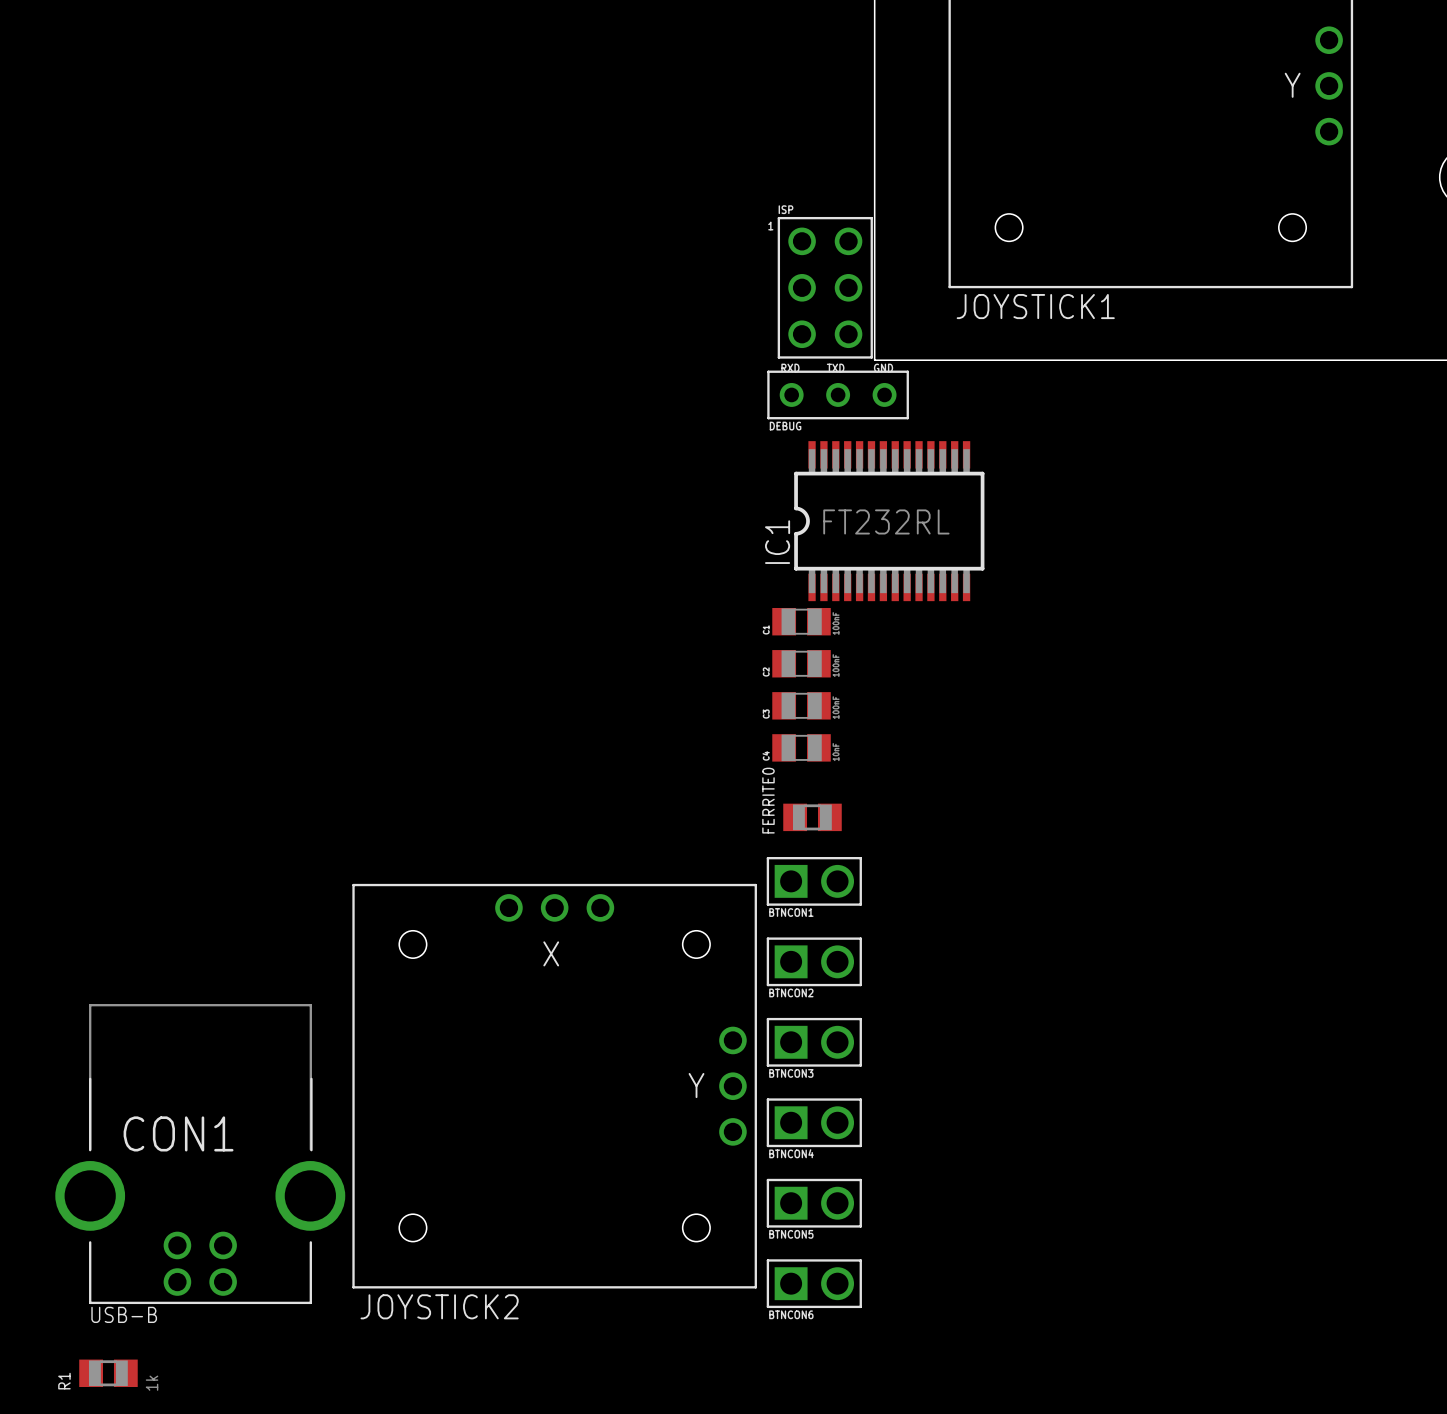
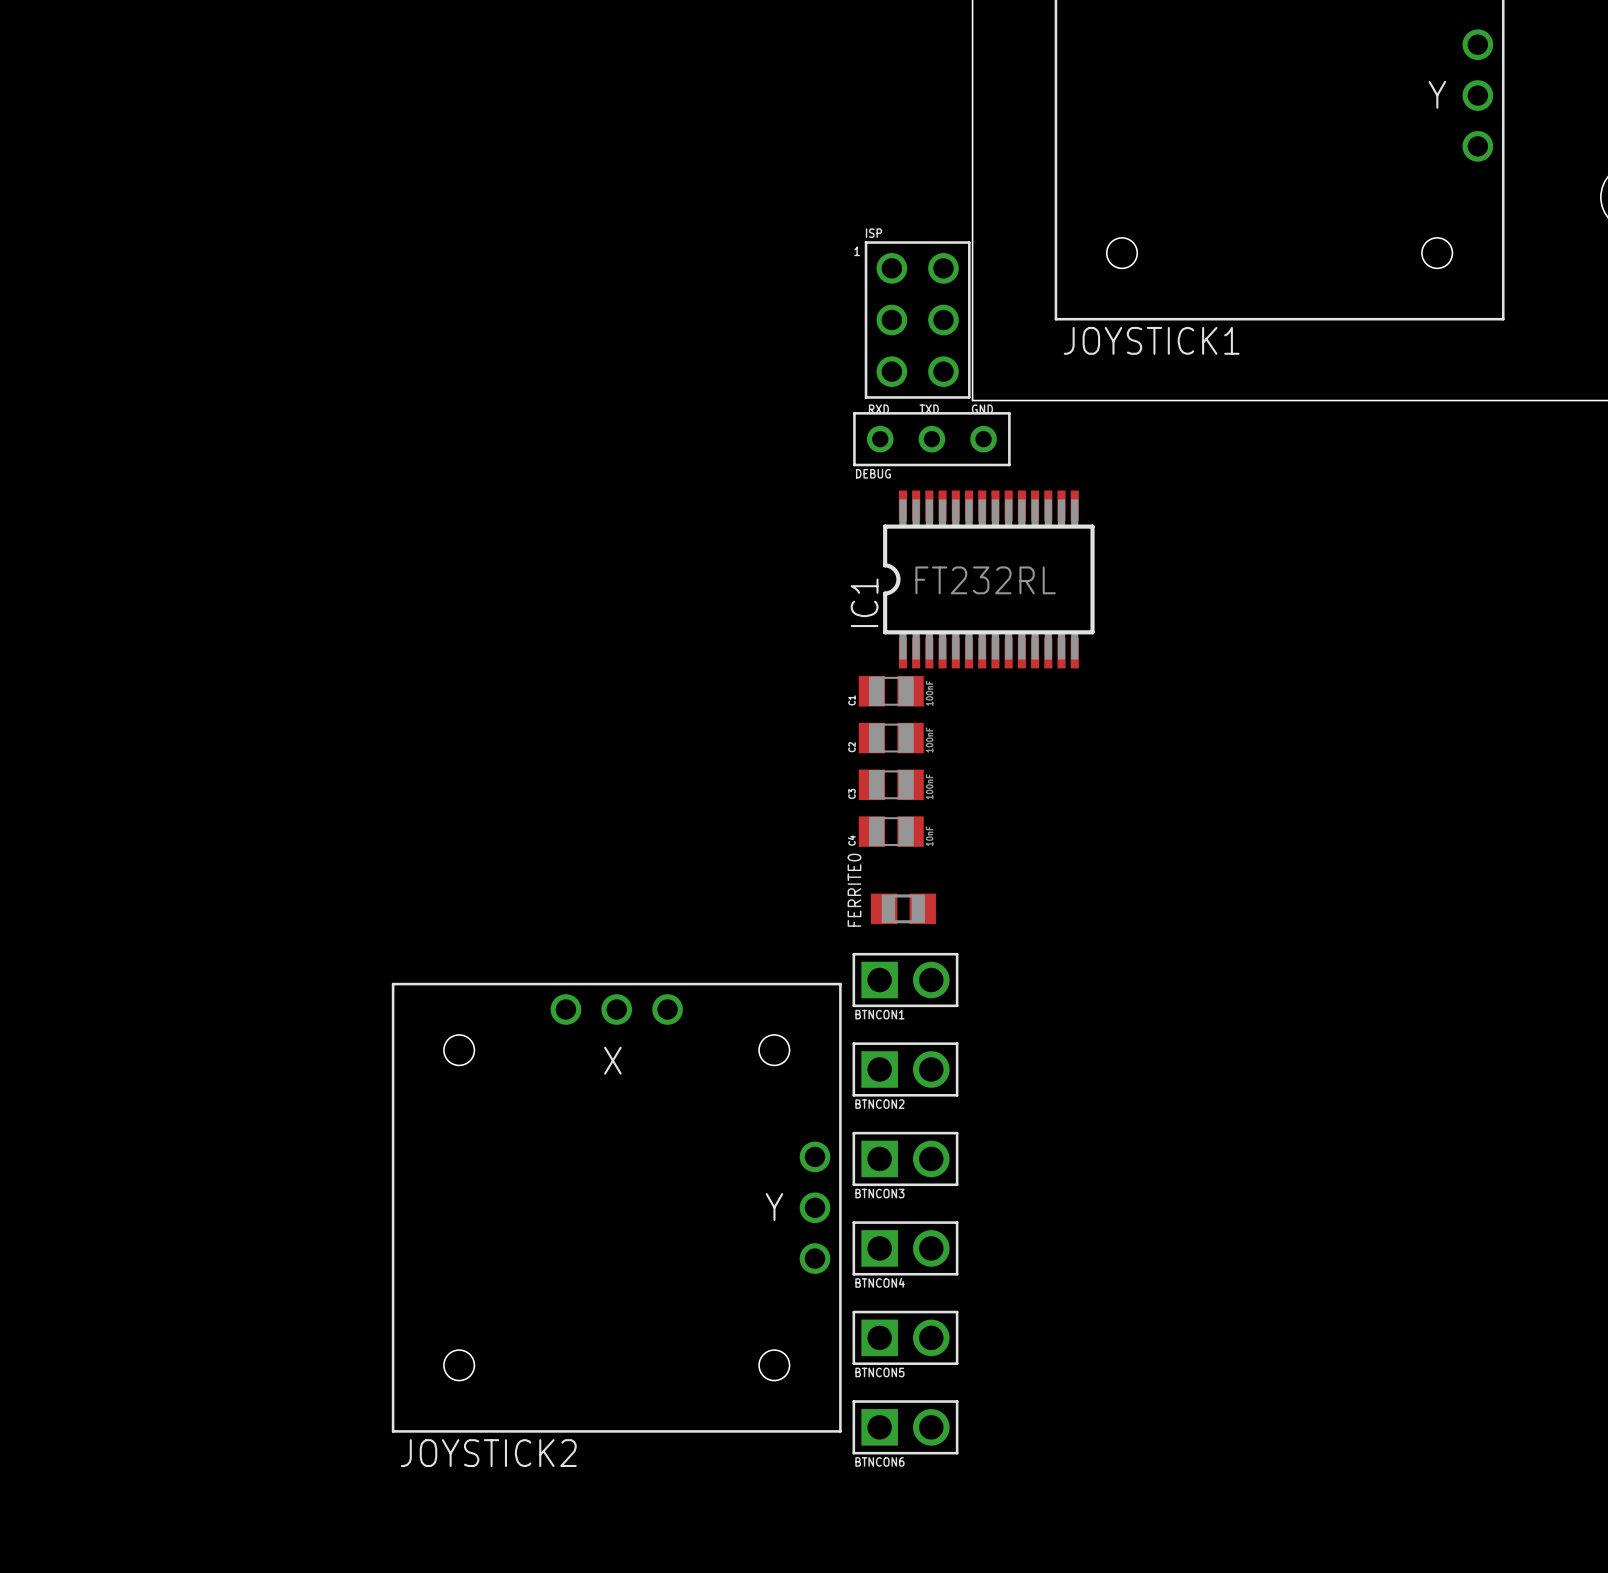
CON1: (200, 1154) -> none
R1: 1k (108, 1373) -> none

